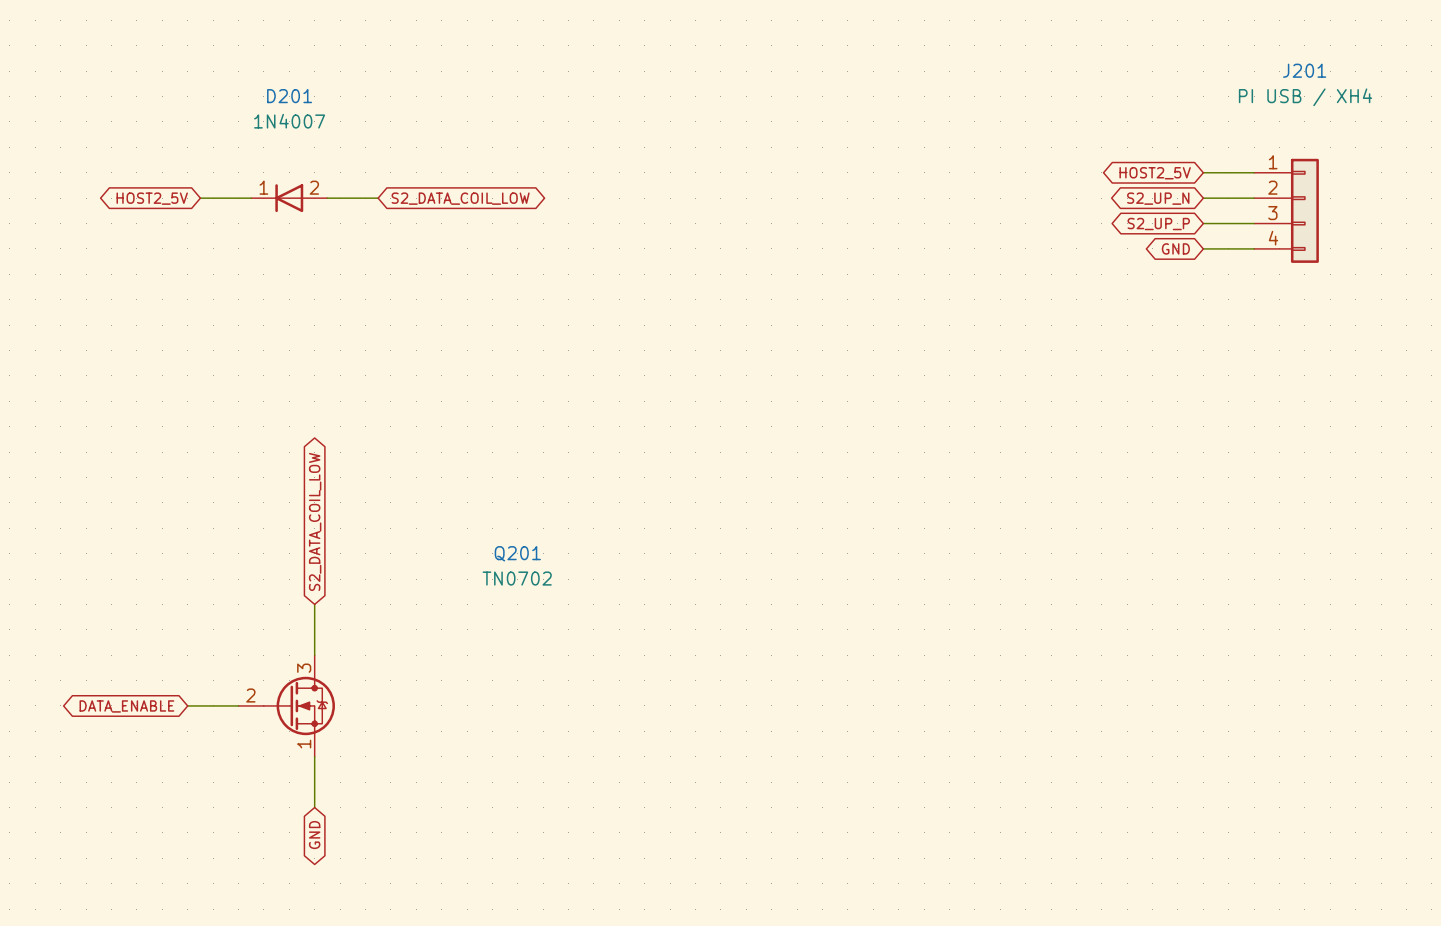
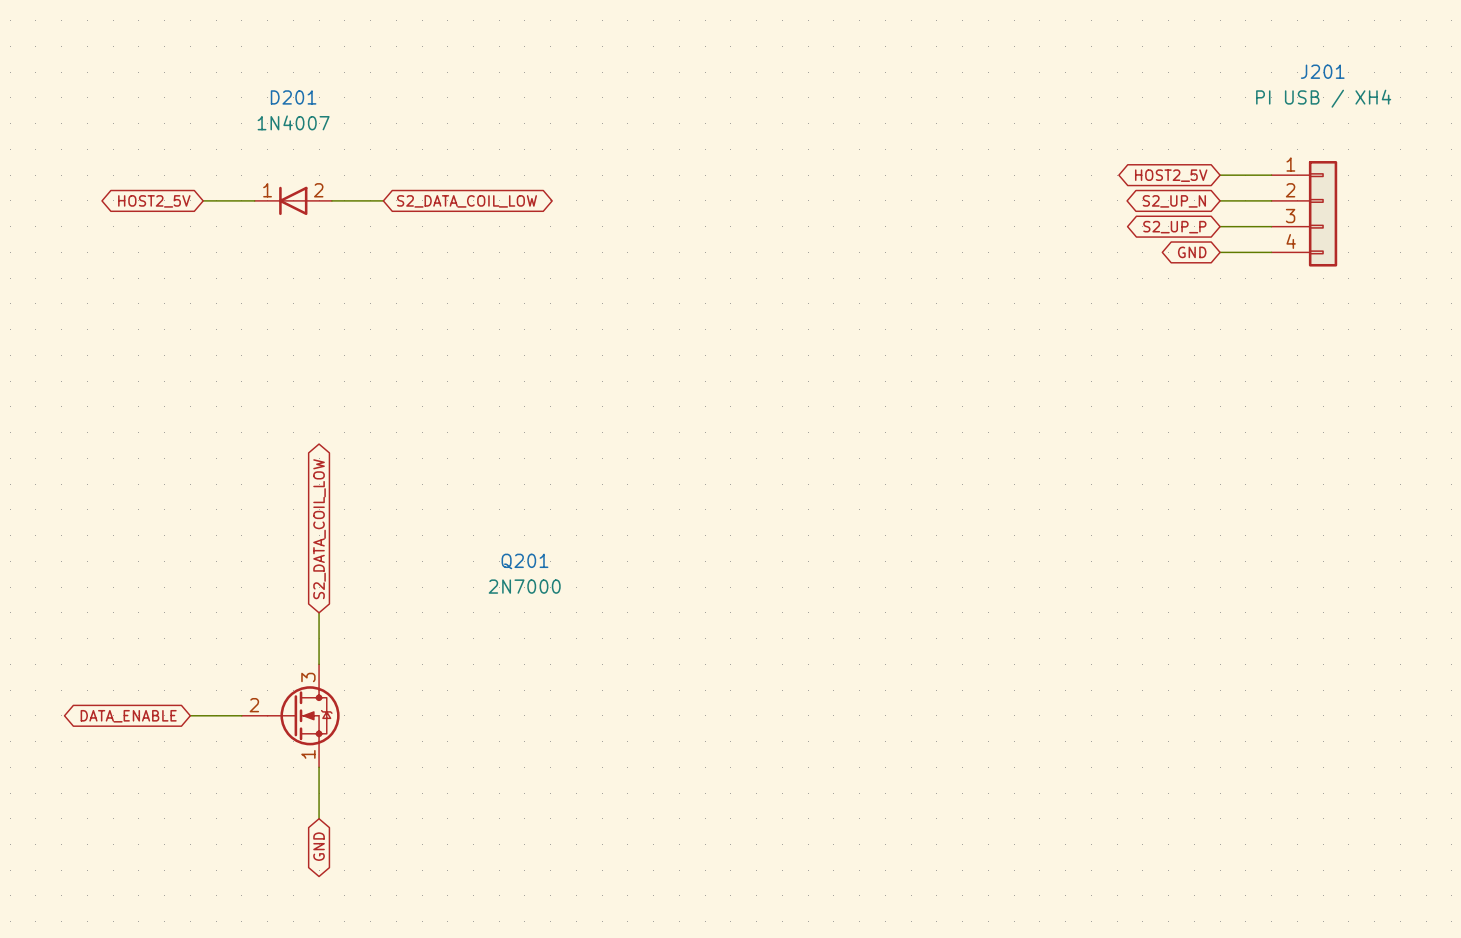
Q201 value: TN0702 (517, 578) -> 2N7000 (524, 586)

